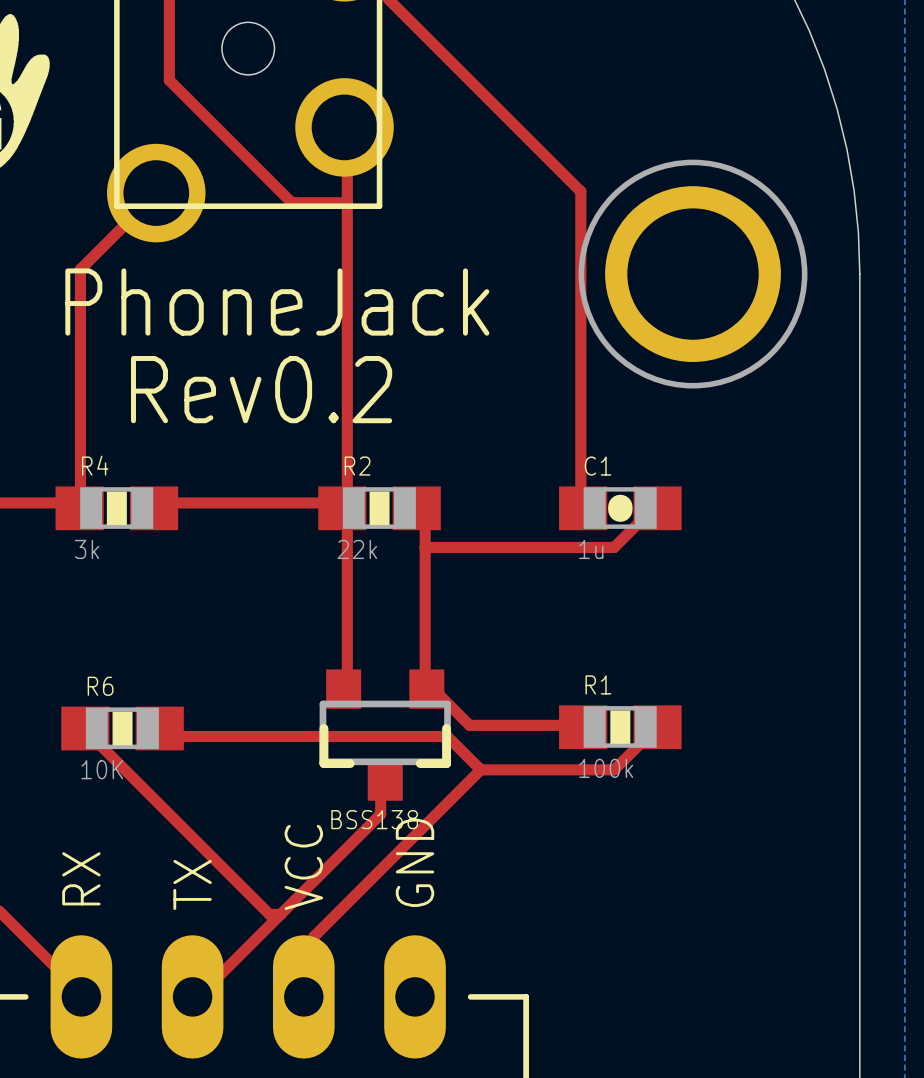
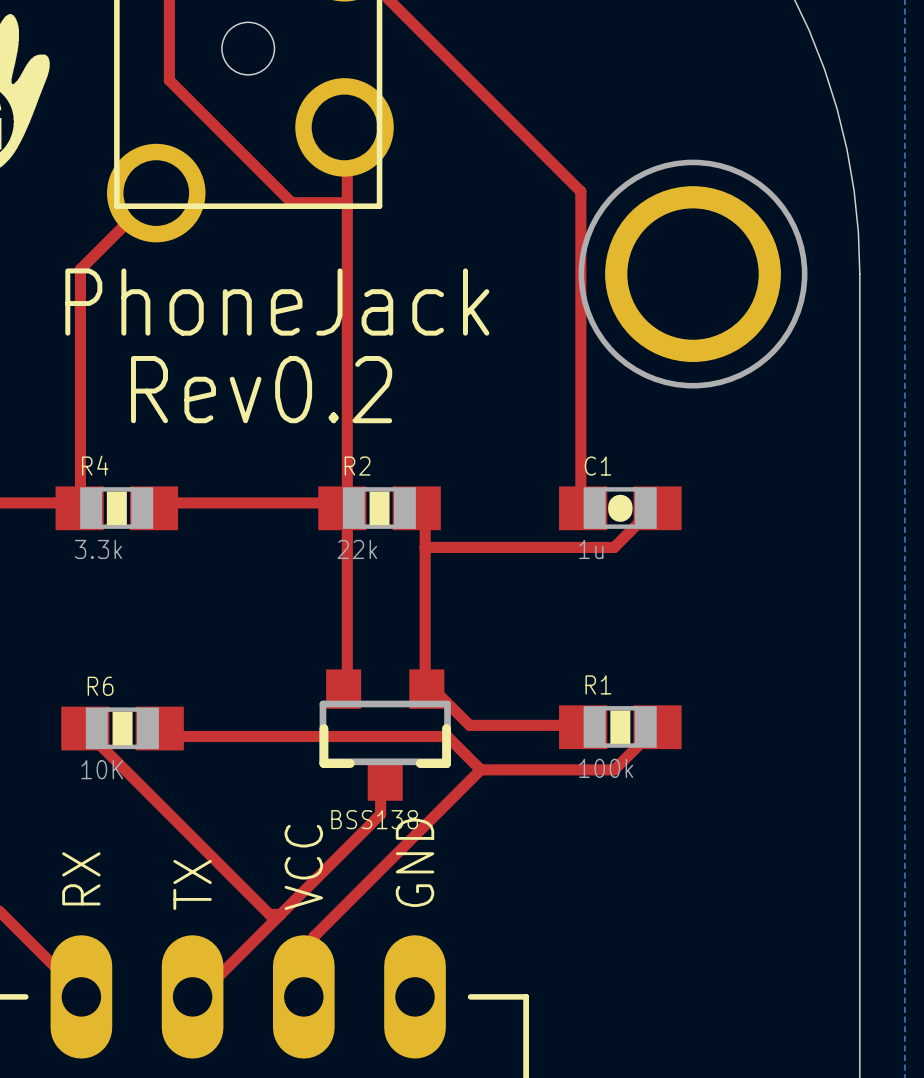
R4 value: 3k (87, 549) -> 3.3k (98, 549)

